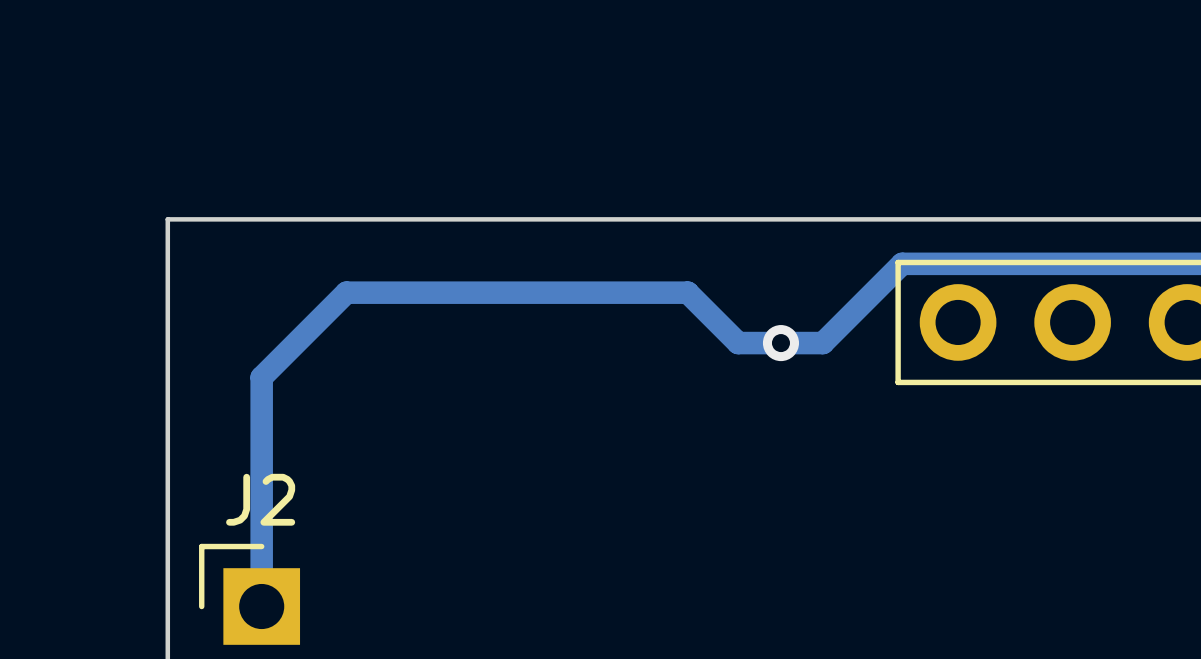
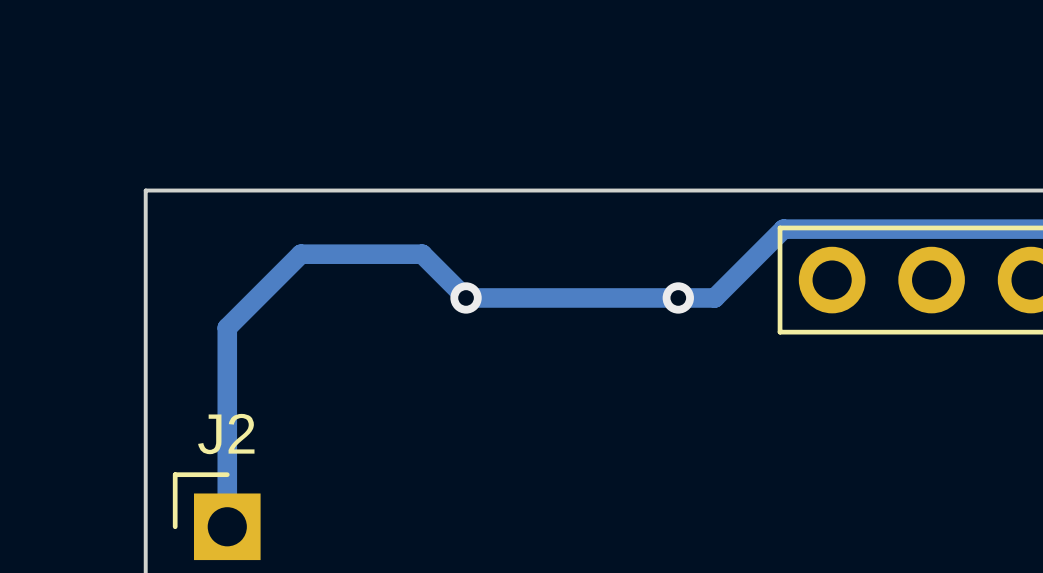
track: (486, 292) (687, 292) (738, 343) -> (422, 254) (466, 297) (641, 297)
via: none -> (466, 297)

